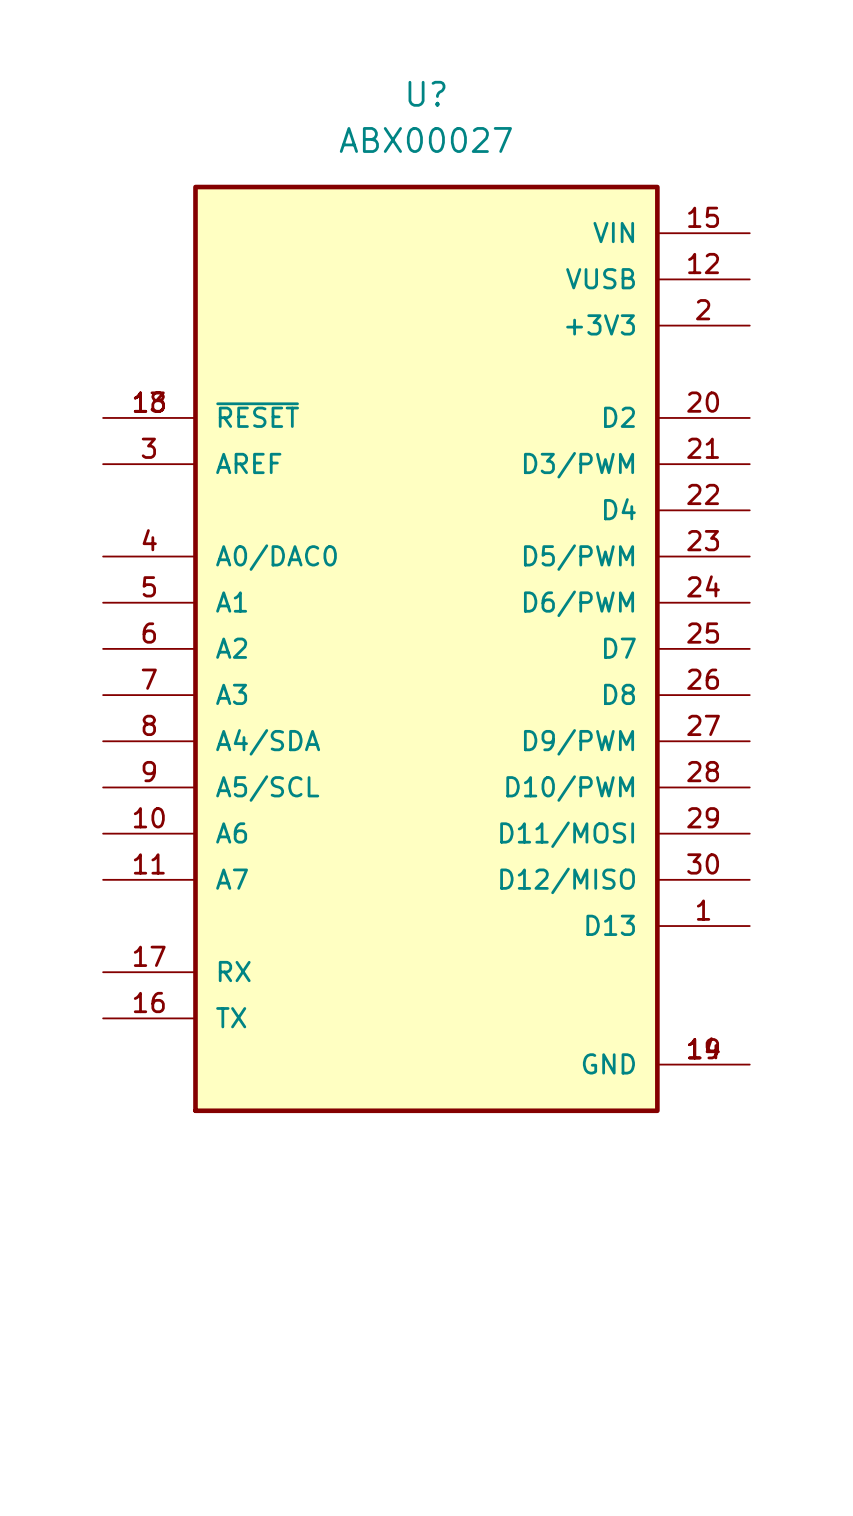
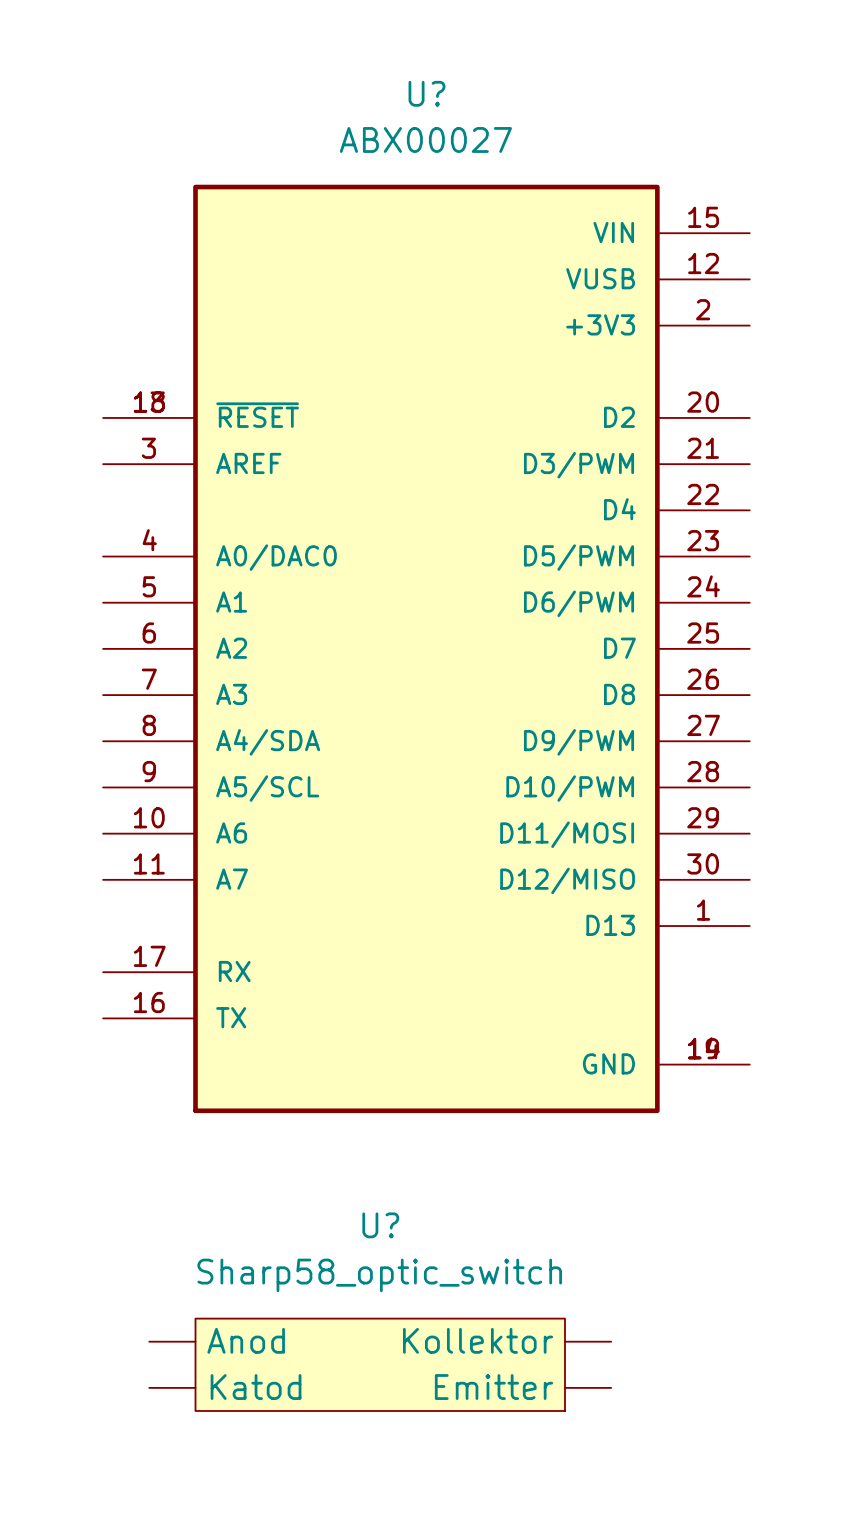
U?: none -> Sharp58_optic_switch (380, 1364)

